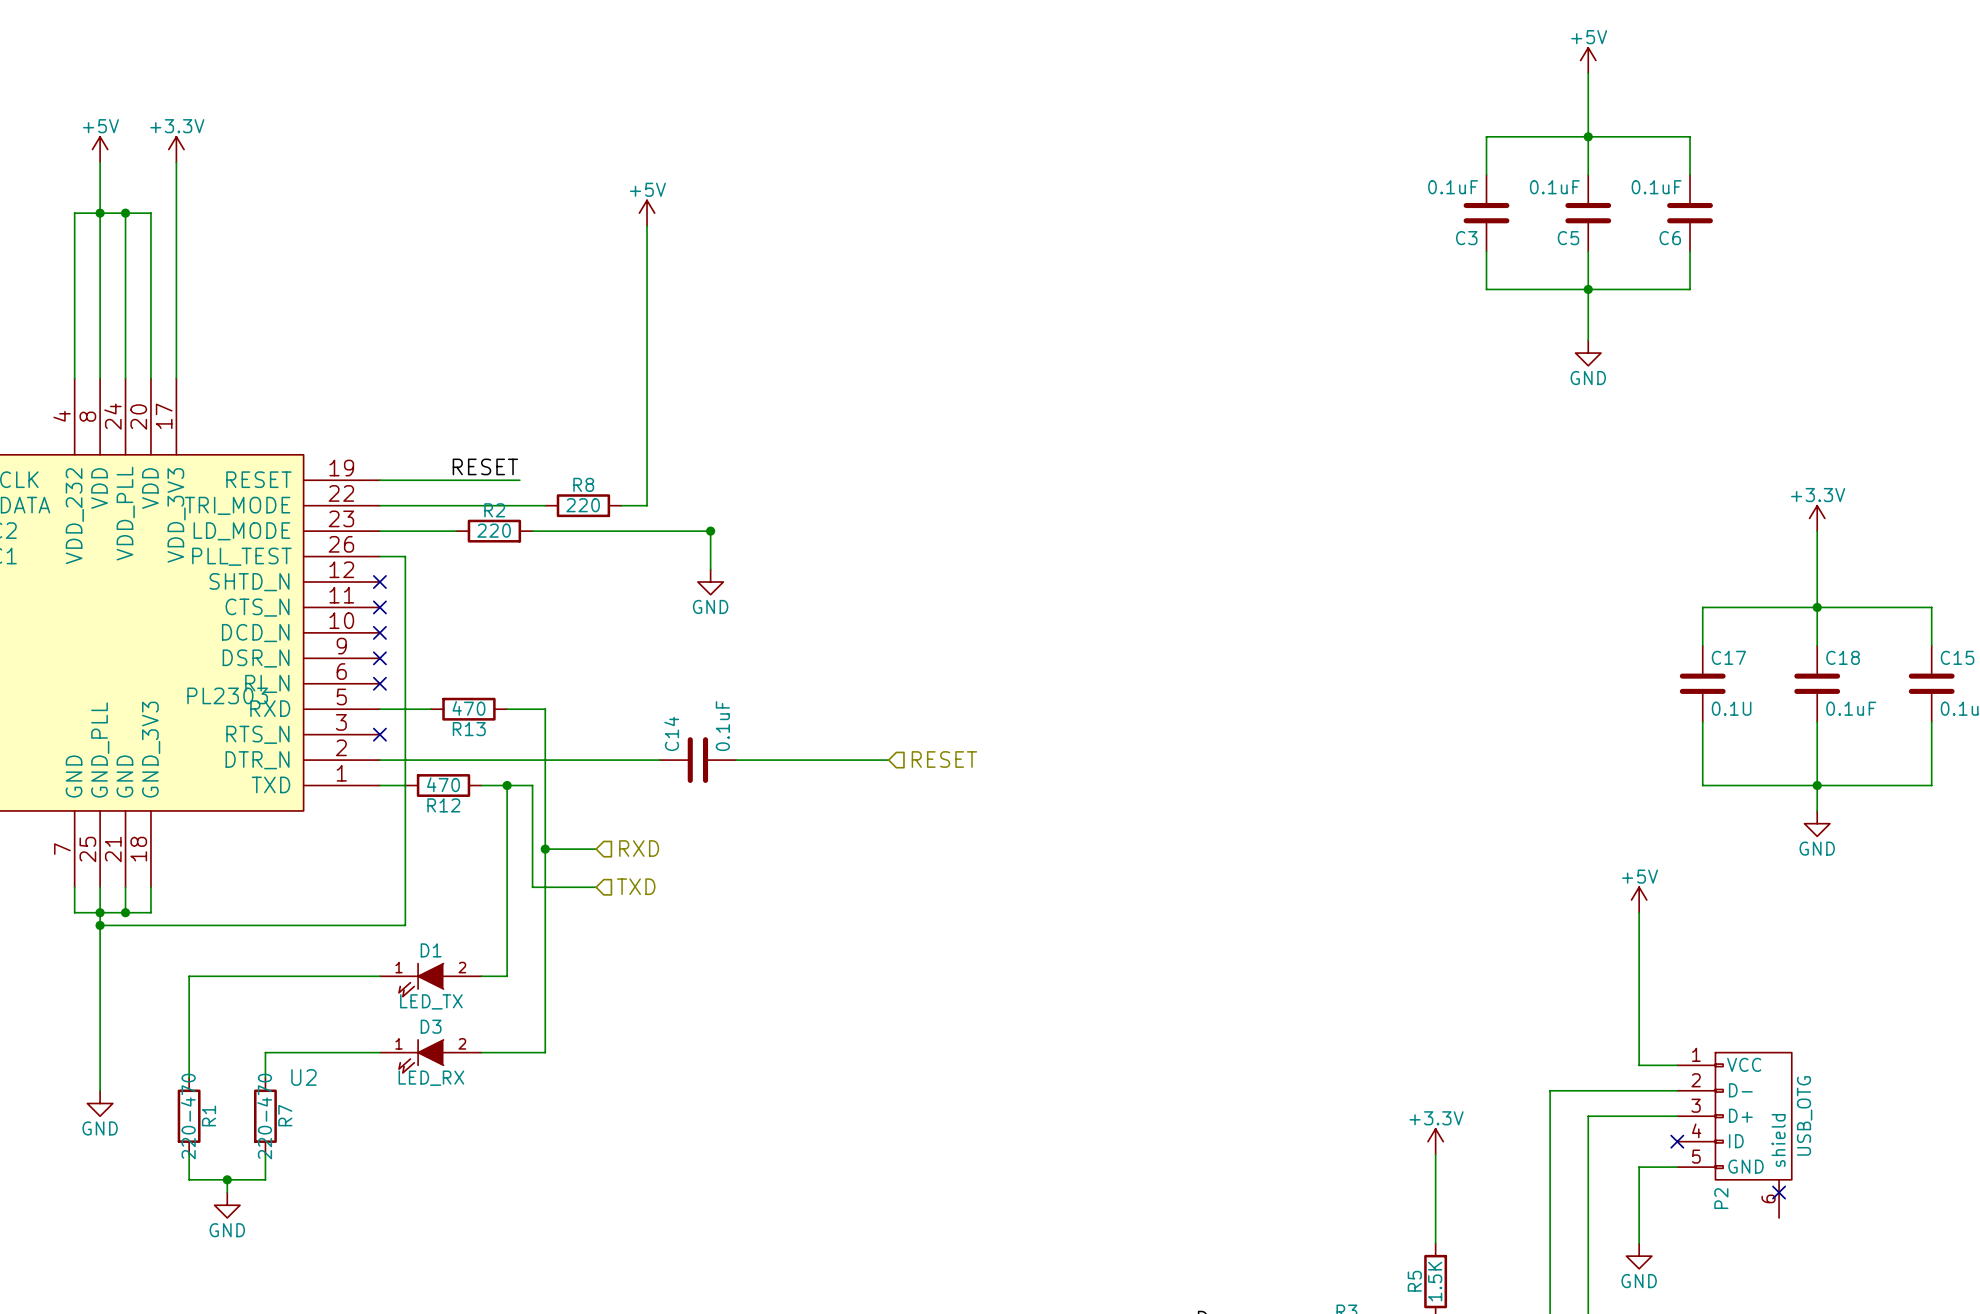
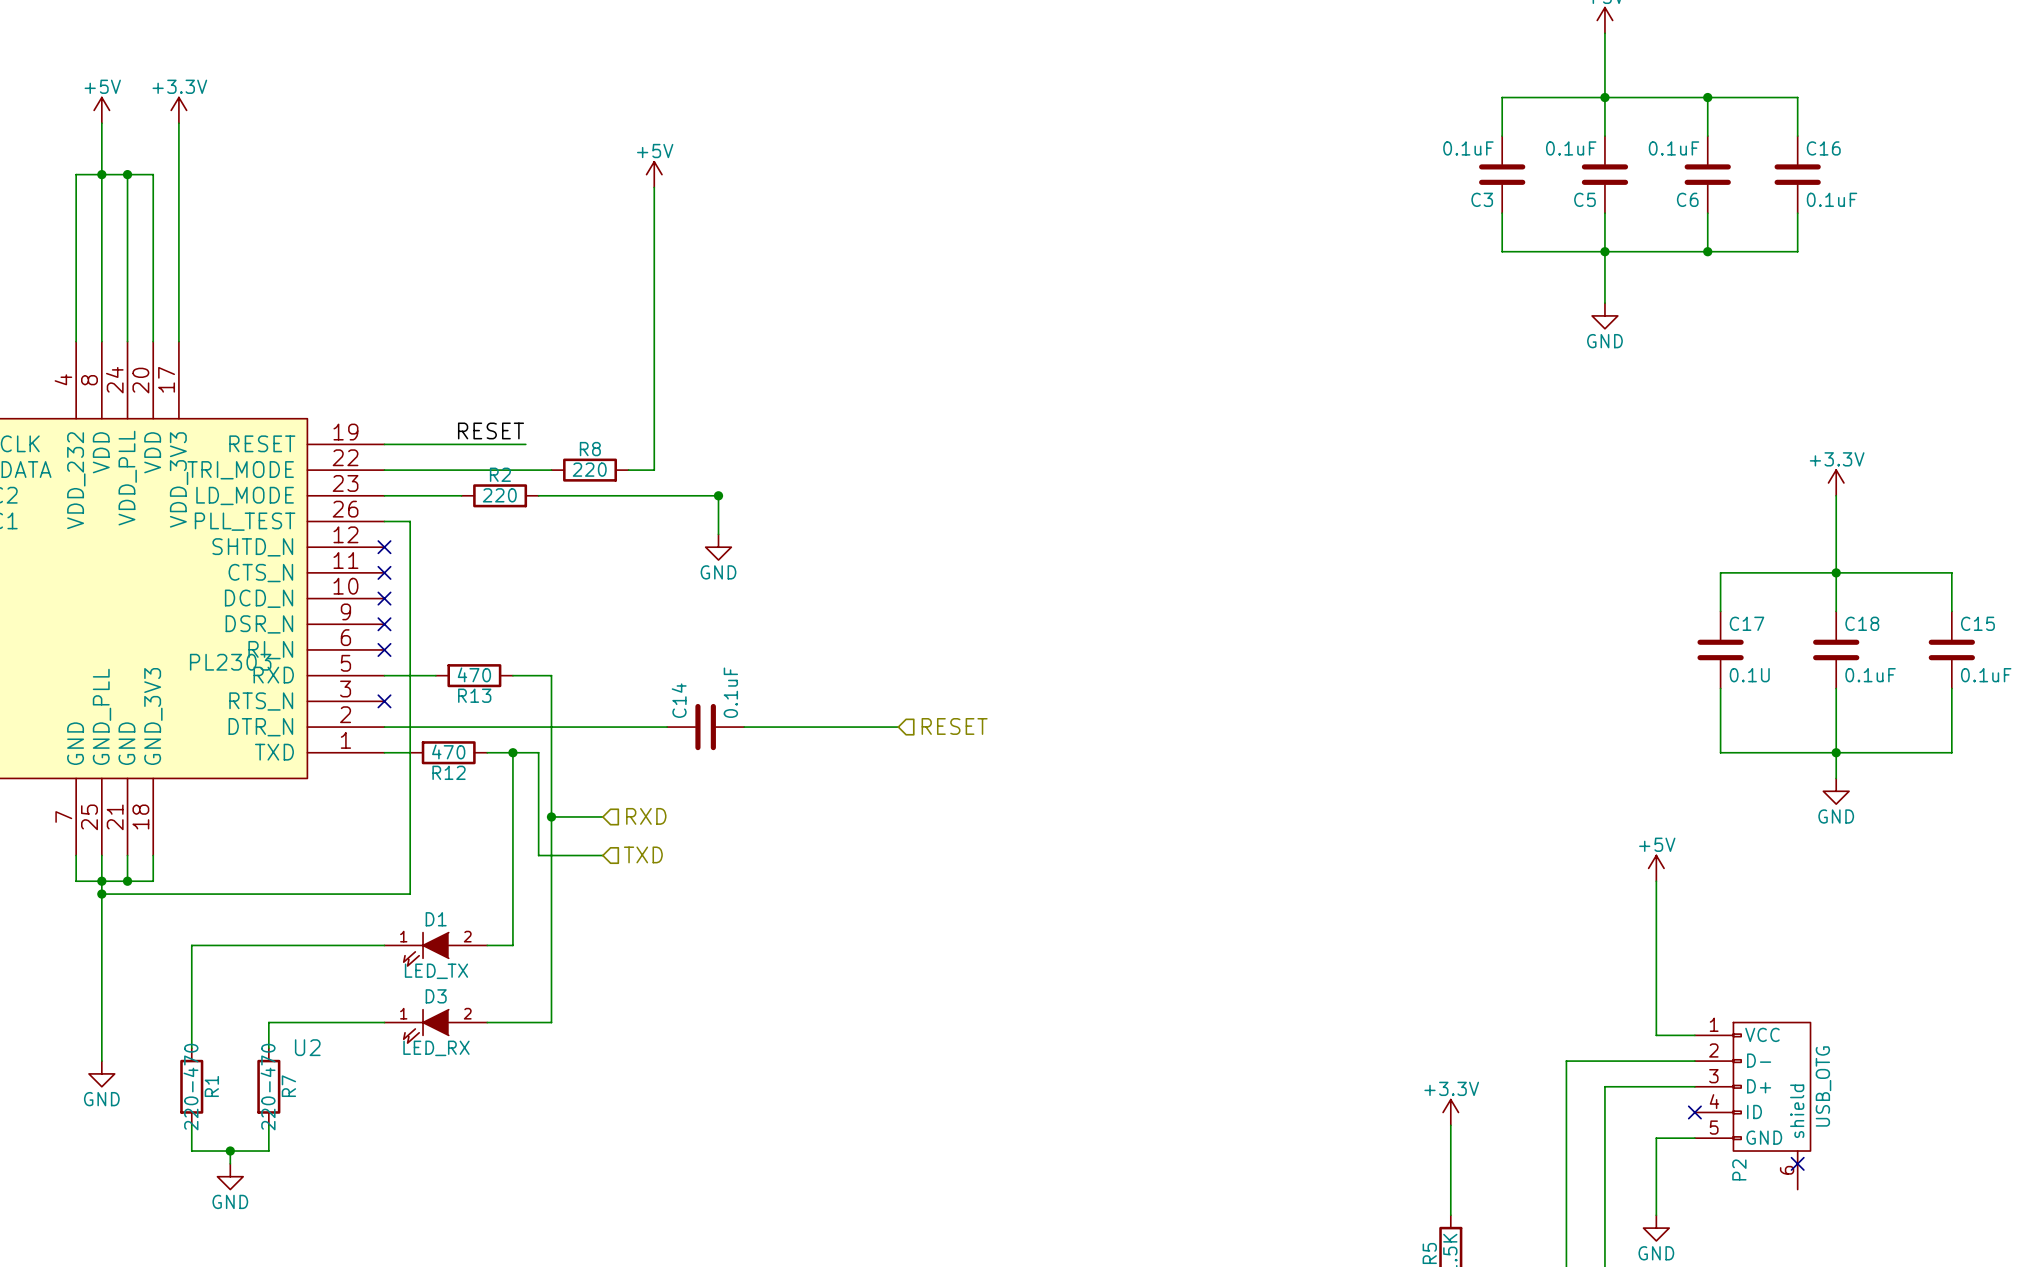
wire: none -> (1707, 97) (1797, 97) (1797, 136)
junction: none -> (1707, 97)
C16: none -> 0.1uF (1797, 174)
wire: none -> (1797, 213) (1797, 251) (1707, 251)
junction: none -> (1707, 251)

